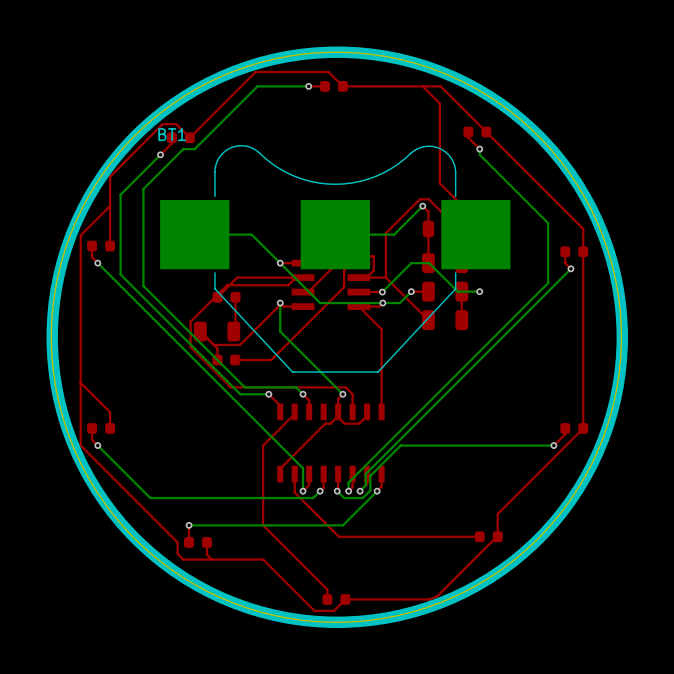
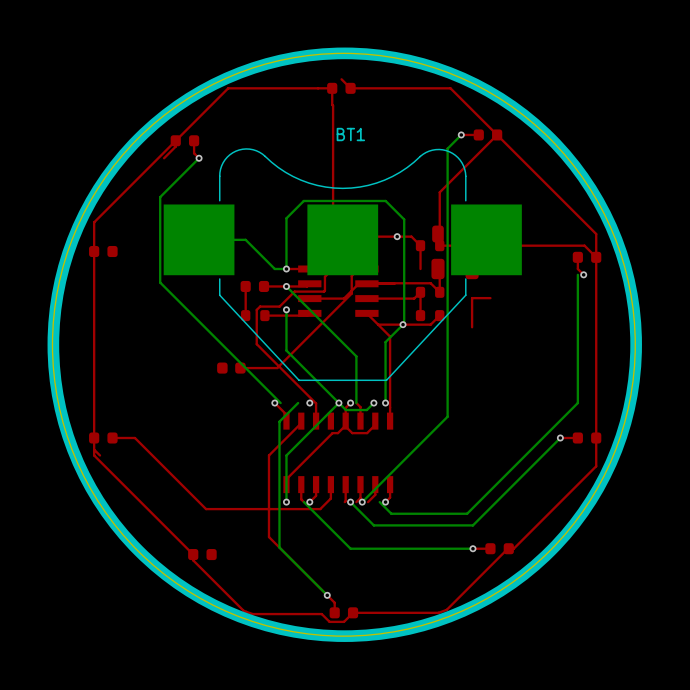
top track: (334, 77) (328, 72) (255, 72) (189, 137) (176, 124) (162, 124) (110, 176) (110, 246) -> none
top track: none -> (315, 88) (228, 88) (94, 222) (94, 251)
bottom track: (308, 86) (257, 86) (194, 149) (183, 149) (143, 189) (143, 285) (244, 387) (296, 387) (303, 394) -> none
via: (308, 86) -> none
top track: (422, 86) (439, 103) (439, 183) (461, 205) (461, 263) -> none
bottom track: none -> (461, 134) (447, 148) (447, 416) (362, 502)
top track: (468, 132) (468, 137) (479, 149) -> (478, 134) (461, 134)
top track: none -> (497, 134) (439, 192) (439, 245) (584, 245) (596, 257)
BT1 name position: BT1 (172, 134) -> BT1 (350, 134)
top track: none -> (194, 140) (194, 153) (199, 158)
bottom track: (479, 149) (479, 154) (548, 223) (548, 283) (348, 482) (348, 491) -> none
via position: (479, 149) -> (461, 134)
bottom track: (160, 154) (120, 194) (120, 274) (240, 394) (268, 394) -> none
via position: (160, 154) -> (199, 158)
bottom track: none -> (199, 158) (160, 197) (160, 282) (280, 403)
top track: (110, 206) (80, 235) (80, 445) (177, 542) (177, 553) (183, 559) (263, 559) (314, 610) (333, 610) (336, 608) -> (94, 449) (94, 455) (193, 554) (193, 560) (243, 610) (252, 614) (321, 614) (329, 621) (344, 621)
top track: (422, 206) (428, 211) (428, 263) -> none
bottom track: (422, 206) (394, 234) (335, 234) -> none
via: (422, 206) -> none
top track: (450, 228) (450, 220) (428, 199) (419, 199) (385, 233) (385, 277) (428, 320) -> none
via: none -> (397, 236)
bottom track: (240, 234) (251, 234) (320, 303) (399, 303) (411, 291) -> (245, 239) (274, 268) (286, 268) (286, 218) (303, 200) (385, 200) (404, 219) (404, 323) (385, 342) (385, 403)
top track: none -> (356, 245) (365, 236) (411, 236) (420, 245) (420, 268)
part: none -> (430, 245)
top track: (92, 257) (97, 263) -> (94, 263) (94, 438)
bottom track: (97, 263) (303, 468) (303, 491) -> none
via: (97, 263) -> none
bottom track: none -> (577, 274) (577, 403) (467, 513) (391, 513) (379, 502)
bottom track: (570, 268) (365, 474) (365, 485) (360, 491) -> none
top track: (295, 277) (288, 285) (227, 285) (190, 321) (190, 347) (230, 387) (345, 387) (352, 394) (352, 398) -> (356, 403) (360, 407)
top track: (303, 277) (237, 277) (217, 297) -> (309, 283) (307, 286) (264, 286)
top track: (366, 277) (373, 270) (373, 256) (344, 256) (308, 292) -> (442, 268) (439, 271) (439, 292) (430, 283) (367, 283) (358, 283) (343, 298) (315, 298)
top track: none -> (245, 286) (245, 309)
bottom track: none -> (286, 286) (356, 356) (356, 403)
via: none -> (286, 286)
part: none -> (430, 292)
via: (411, 291) -> none
top track: (428, 291) (411, 291) -> none
part: (445, 291) -> none
bottom track: (479, 291) (457, 291) (429, 263) (411, 263) (382, 292) -> none
via: (479, 291) -> none
top track: none -> (390, 298) (414, 298) (420, 292) (420, 315)
via: (382, 292) -> none
part position: (226, 297) -> (254, 286)
top track: (235, 297) (235, 329) (233, 331) -> none
top track: (382, 303) (379, 306) (358, 306) -> none
via: (382, 303) -> none
top track: (303, 306) (283, 306) (280, 303) (240, 344) (213, 344) -> (309, 313) (307, 315) (264, 315)
part: none -> (255, 315)
part: none -> (430, 315)
top track: none -> (439, 315) (430, 324) (378, 324)
via: none -> (403, 324)
part: (445, 320) -> none
top track: (200, 331) (217, 348) (217, 360) -> none
part: (217, 331) -> none
bottom track: (280, 331) (342, 394) -> (286, 338) (286, 350) (345, 410) (366, 410) (373, 403)
top track: (80, 382) (110, 412) (110, 428) -> (327, 502) (320, 509) (206, 509) (134, 438) (112, 438)
bottom track: none -> (298, 403) (279, 421) (279, 547) (327, 595)
top track: (303, 394) (309, 400) -> (332, 88) (333, 268) (324, 276) (324, 291) (294, 291) (279, 306) (260, 306) (256, 309) (256, 344) (316, 403) (316, 409)
bottom track: none -> (338, 403) (286, 455) (286, 502)
via: none -> (338, 403)
via: none -> (373, 403)
via: none -> (385, 403)
bottom track: none -> (560, 438) (472, 525) (373, 525) (350, 502)
top track: (565, 428) (565, 434) (553, 445) -> (577, 438) (560, 438)
top track: (583, 428) (497, 513) (497, 536) -> (596, 438) (596, 466) (513, 548) (508, 548)
bottom track: (97, 445) (150, 498) (313, 498) (320, 491) -> none
via: (97, 445) -> none
bottom track: (553, 445) (400, 445) (370, 475) (370, 490) (362, 498) (344, 498) (337, 491) -> none
via position: (553, 445) -> (560, 438)
top track: (294, 488) (294, 492) (338, 536) (462, 536) -> (301, 499) (303, 502)
via: none -> (286, 502)
bottom track: none -> (303, 502) (350, 548) (472, 548)
via: (320, 491) -> none
via: (337, 491) -> none
via: none -> (350, 502)
via: (348, 491) -> none
via: none -> (362, 502)
via: (360, 491) -> none
bottom track: (377, 491) (342, 525) (189, 525) -> none
top track: (189, 525) (189, 542) -> none
via: (189, 525) -> none
via: none -> (472, 548)
top track: (206, 542) (206, 554) (211, 559) -> none
via: none -> (327, 595)

